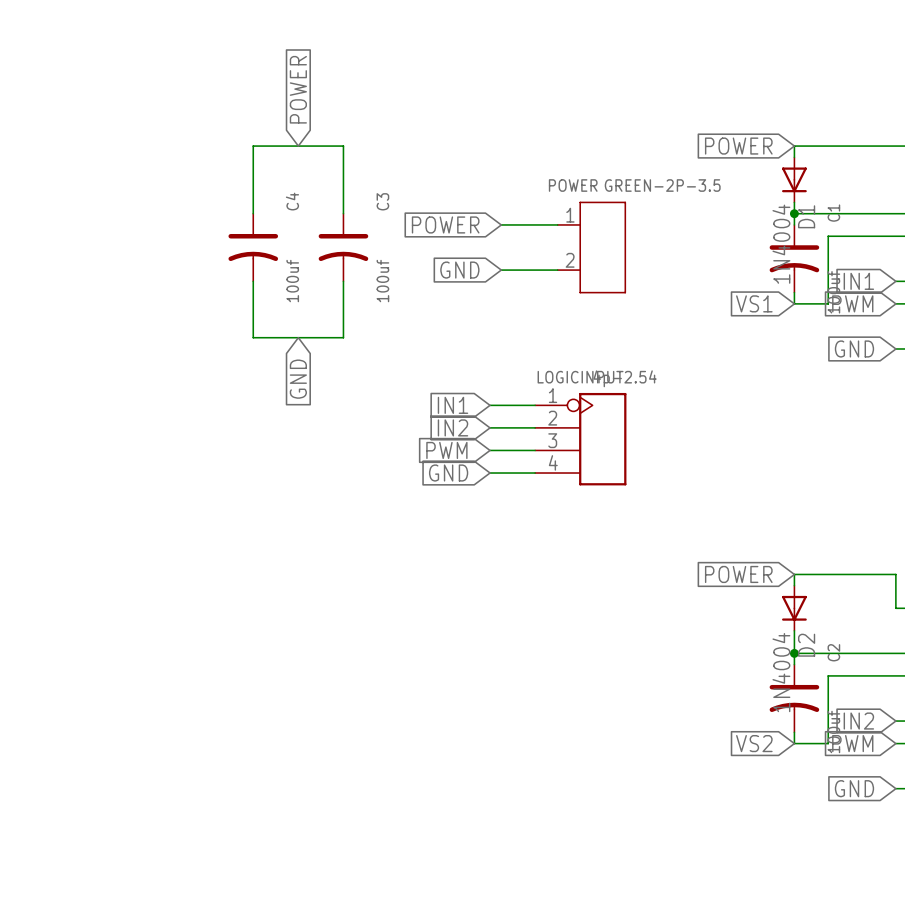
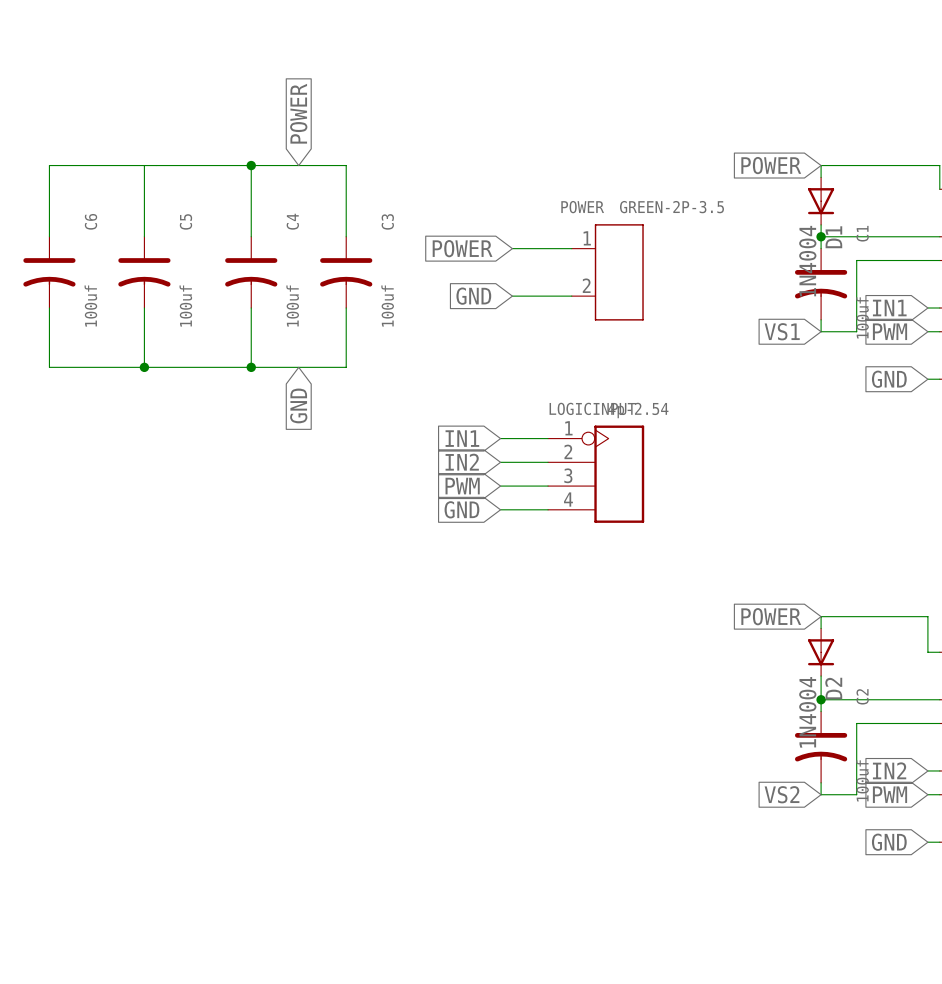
wire: none -> (144, 165) (144, 236)
wire: none -> (251, 165) (49, 165) (49, 236)
junction: none -> (251, 165)
C6: none -> 100uf (49, 272)
C5: none -> 100uf (144, 272)
wire: none -> (49, 307) (49, 367) (251, 367)
wire: none -> (144, 307) (144, 367)
junction: none -> (144, 367)
junction: none -> (251, 367)

